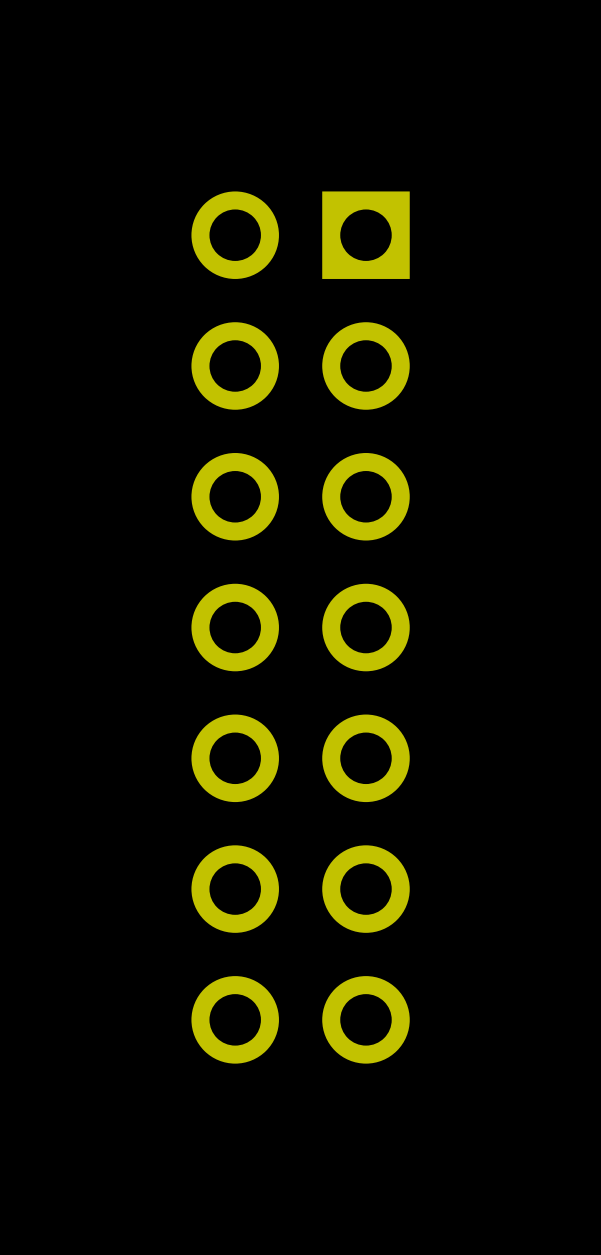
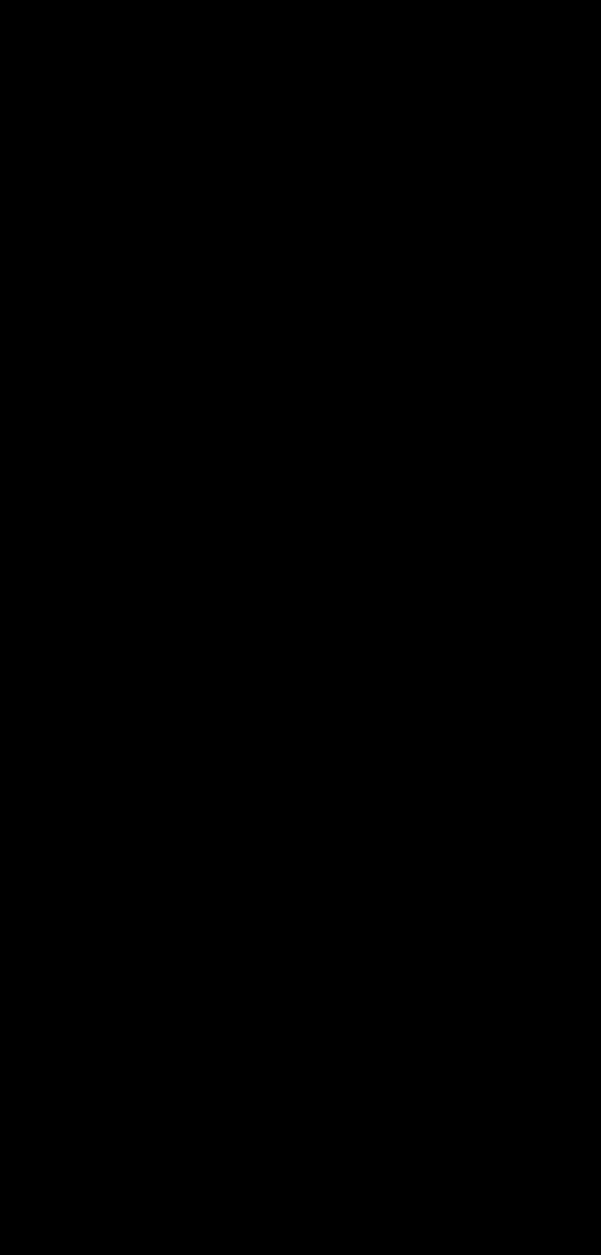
part: (300, 627) -> none

